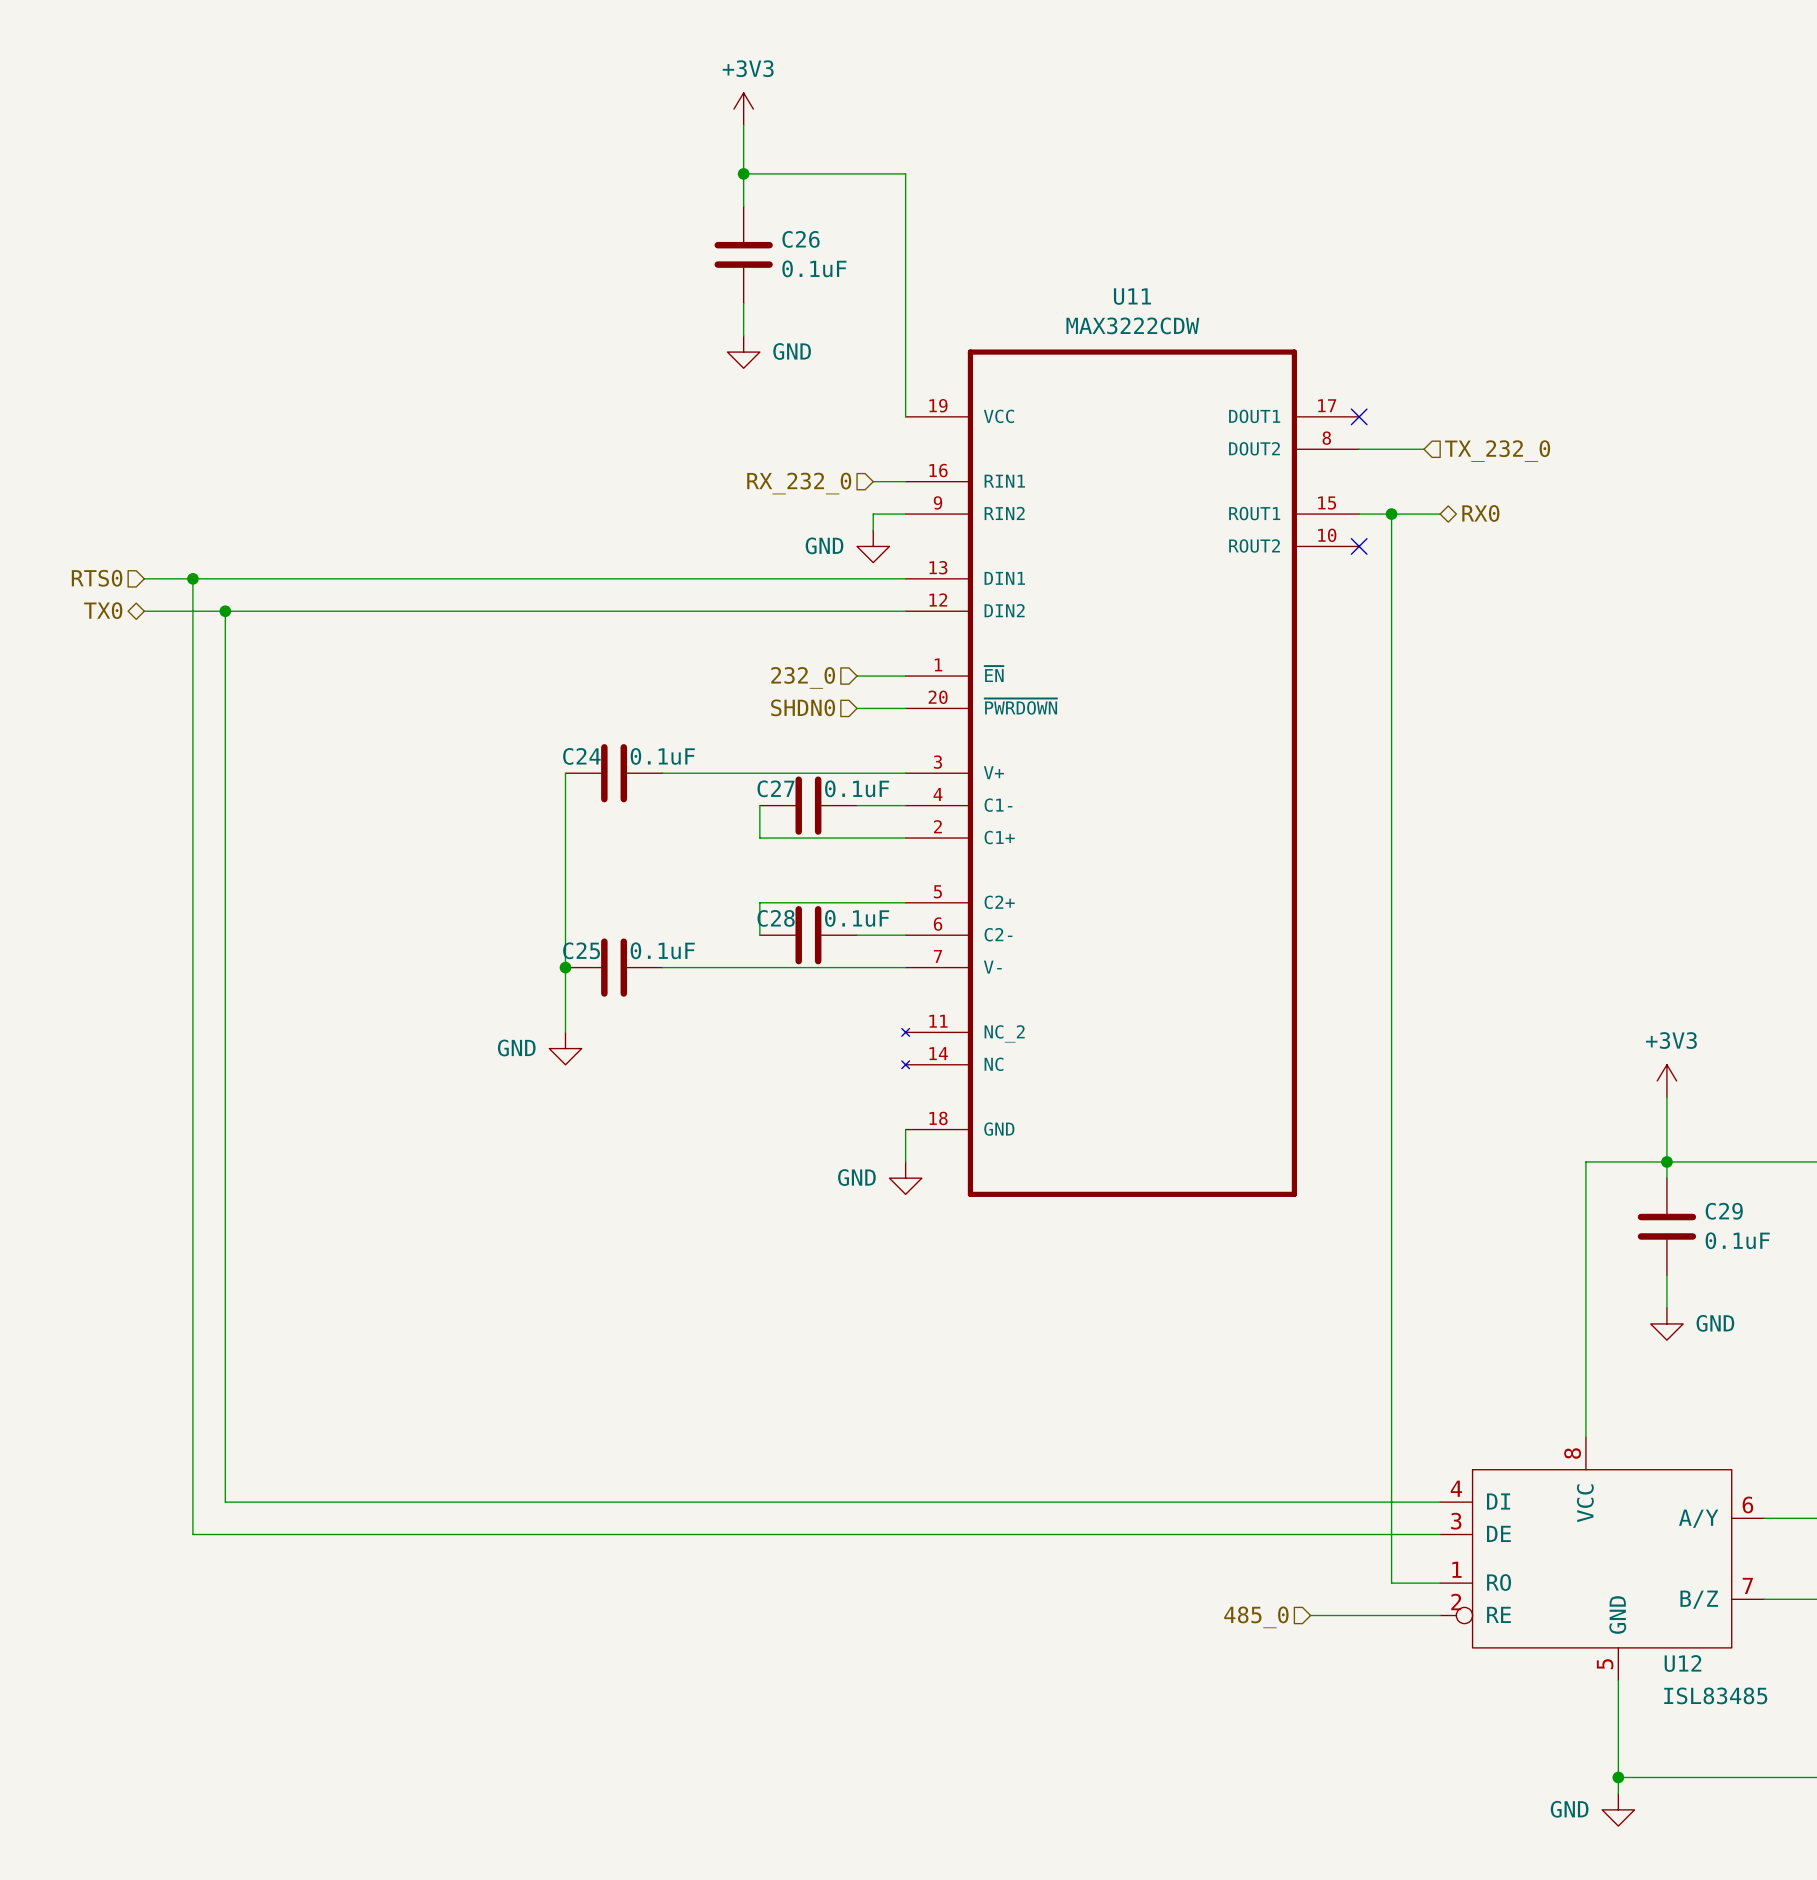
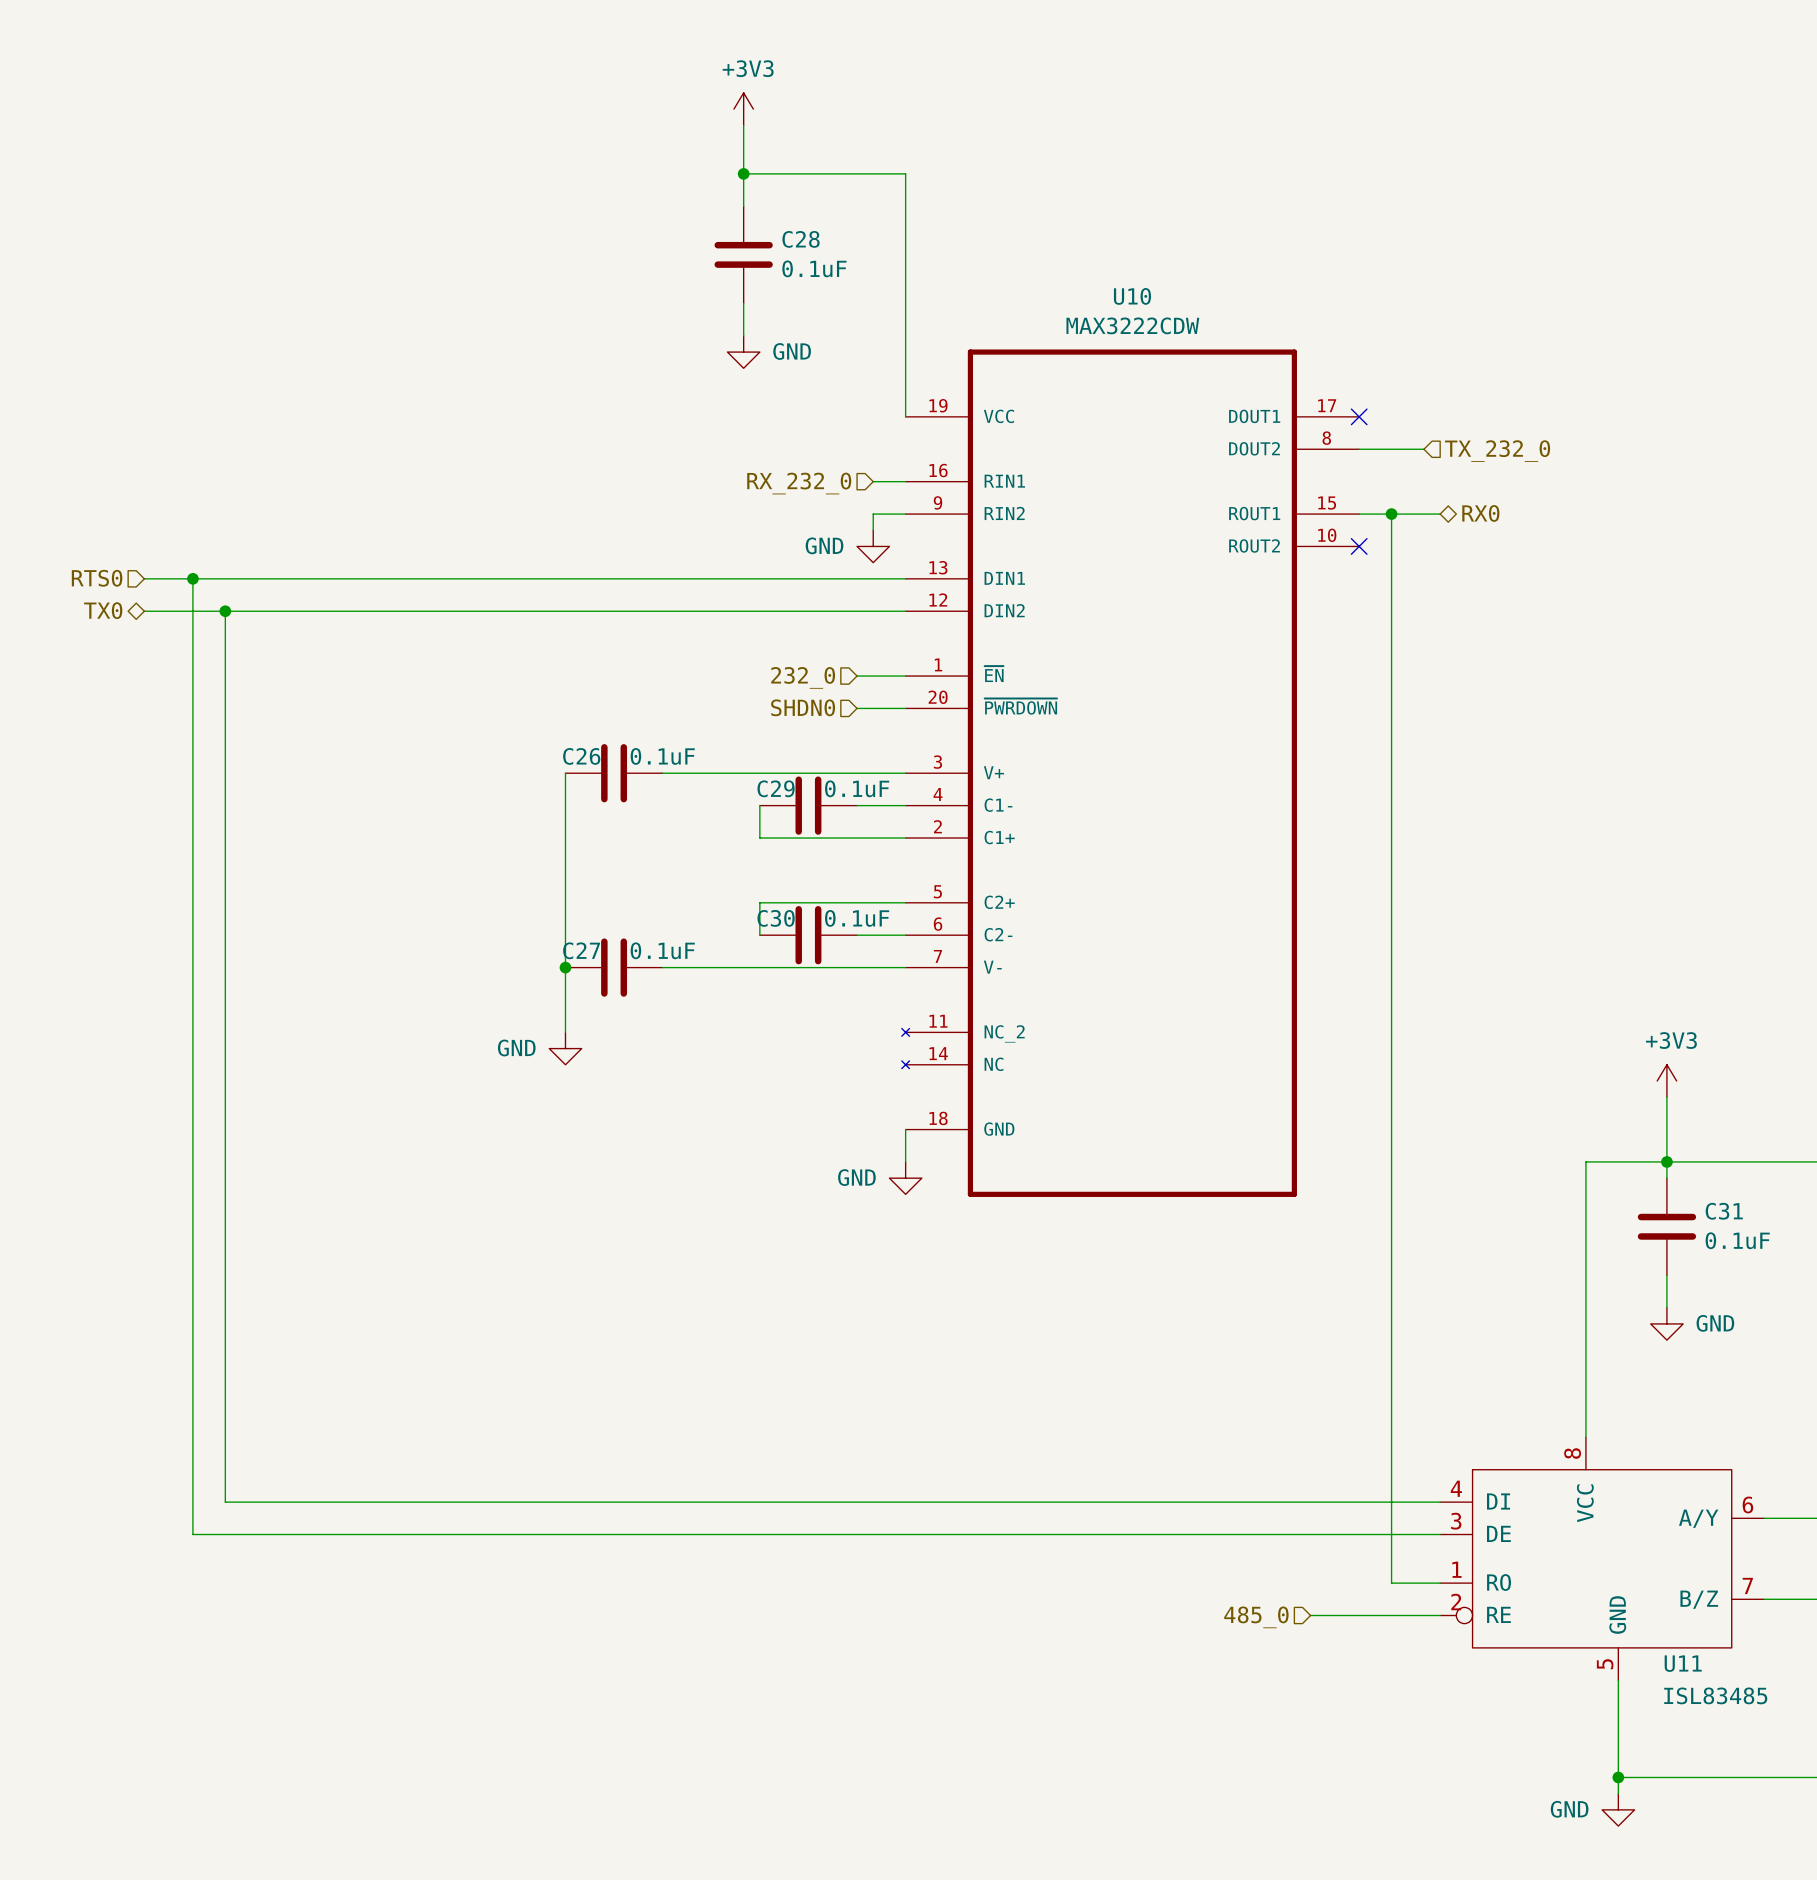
C26 name: C26 (801, 239) -> C28 (801, 239)
U11 name: U11 (1132, 296) -> U10 (1132, 296)
C24 name: C24 (581, 756) -> C26 (581, 756)
C27 name: C27 (775, 788) -> C29 (776, 788)
C28 name: C28 (776, 918) -> C30 (776, 918)
C25 name: C25 (581, 950) -> C27 (581, 950)
C29 name: C29 (1724, 1211) -> C31 (1724, 1211)
U12 name: U12 (1682, 1663) -> U11 (1683, 1663)

